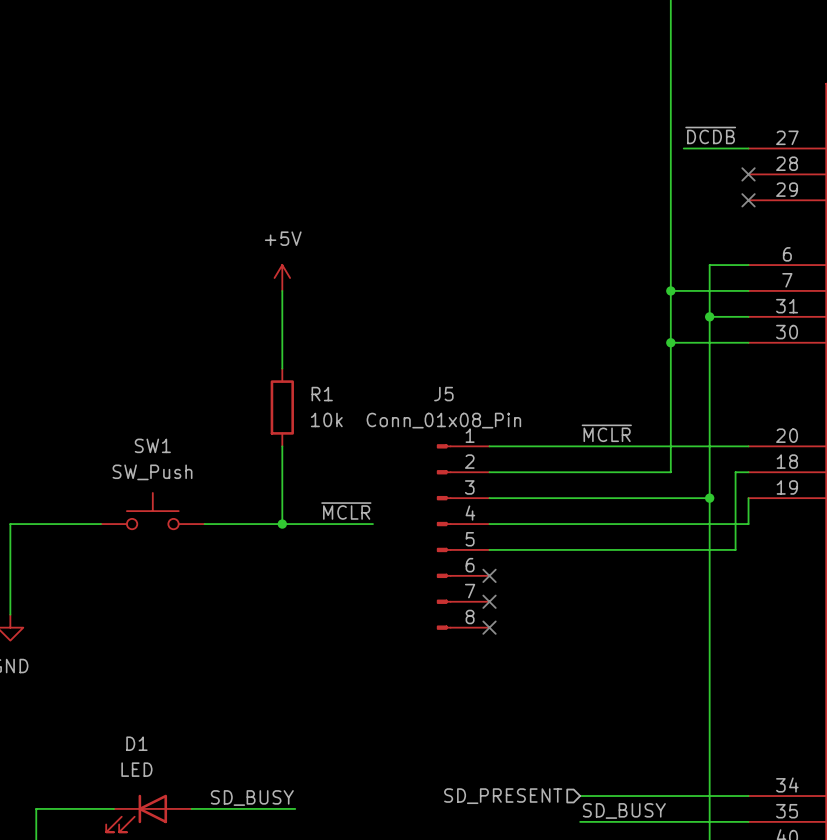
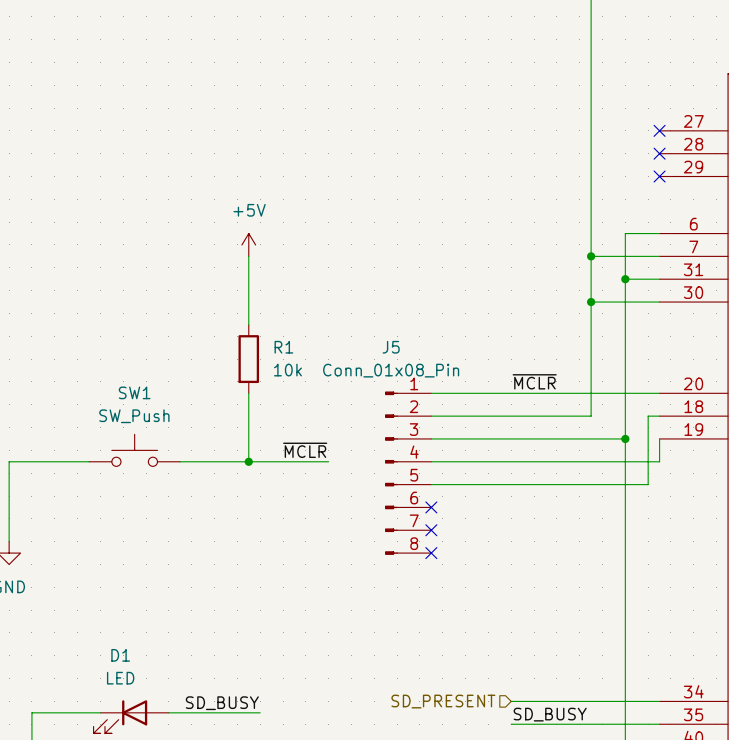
label: ~{DCDB} (710, 135) -> none
wire: (683, 148) (748, 148) -> none
no-connect mark: none -> (659, 130)

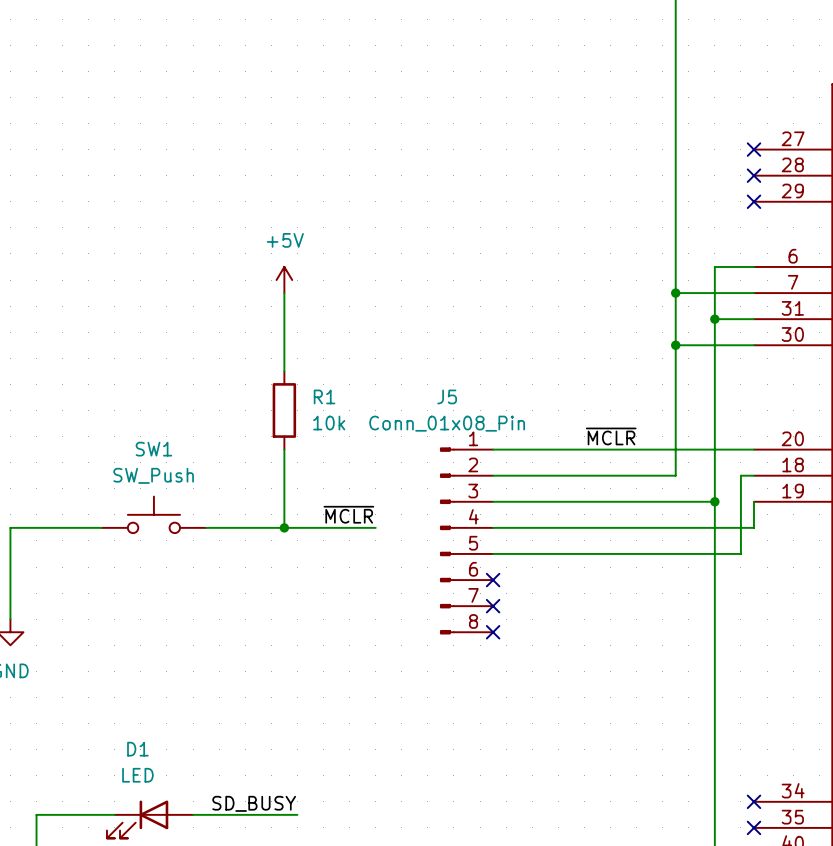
hierarchical label: SD_PRESENT (443, 701) -> none
wire: (511, 701) (659, 701) -> none
no-connect mark: none -> (753, 801)
label: SD_BUSY (550, 714) -> none
wire: (511, 724) (659, 724) -> none
no-connect mark: none -> (753, 827)

